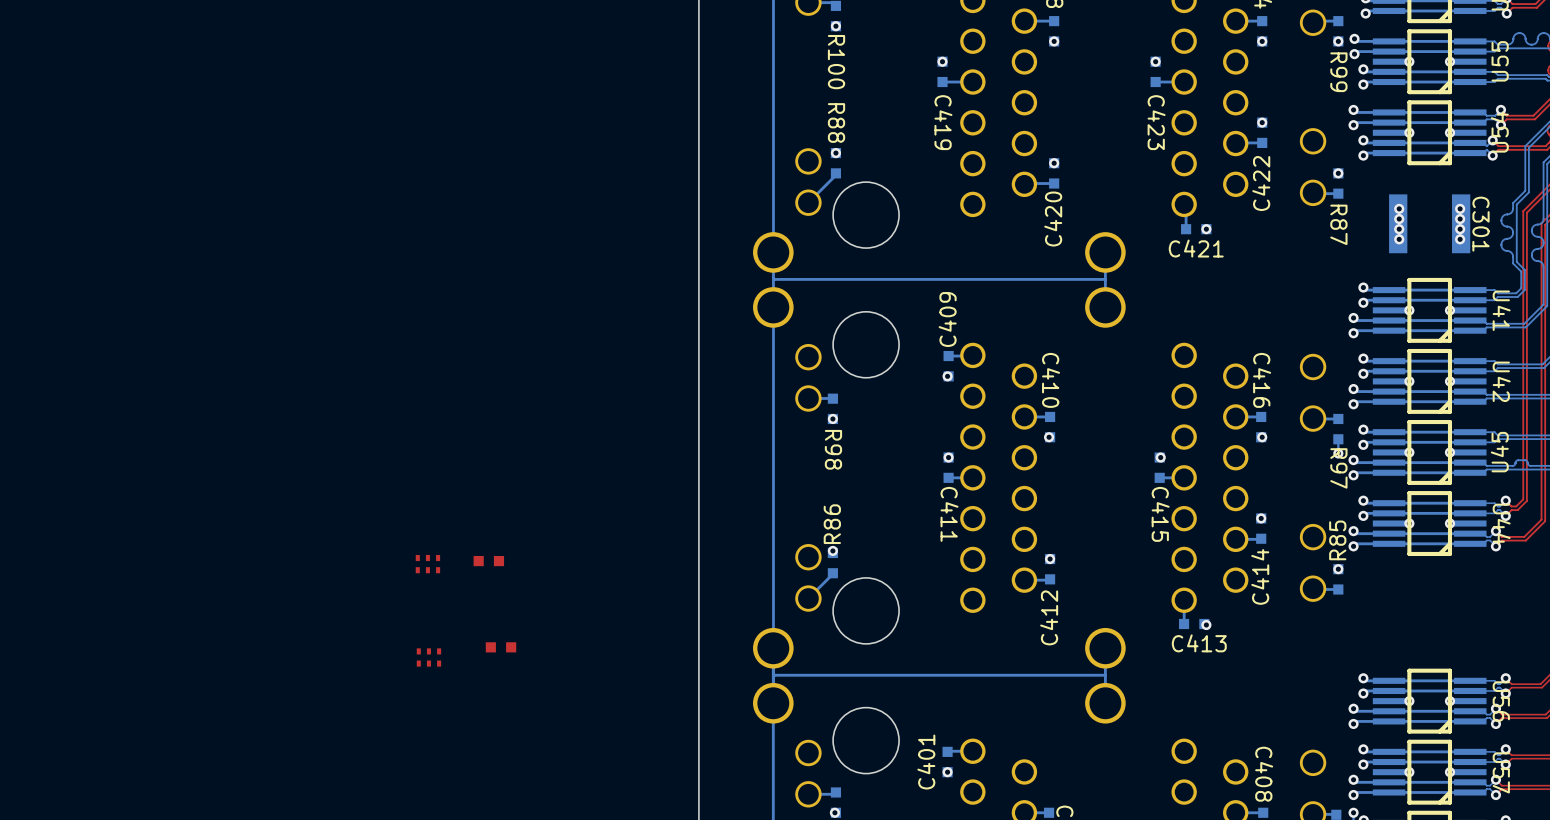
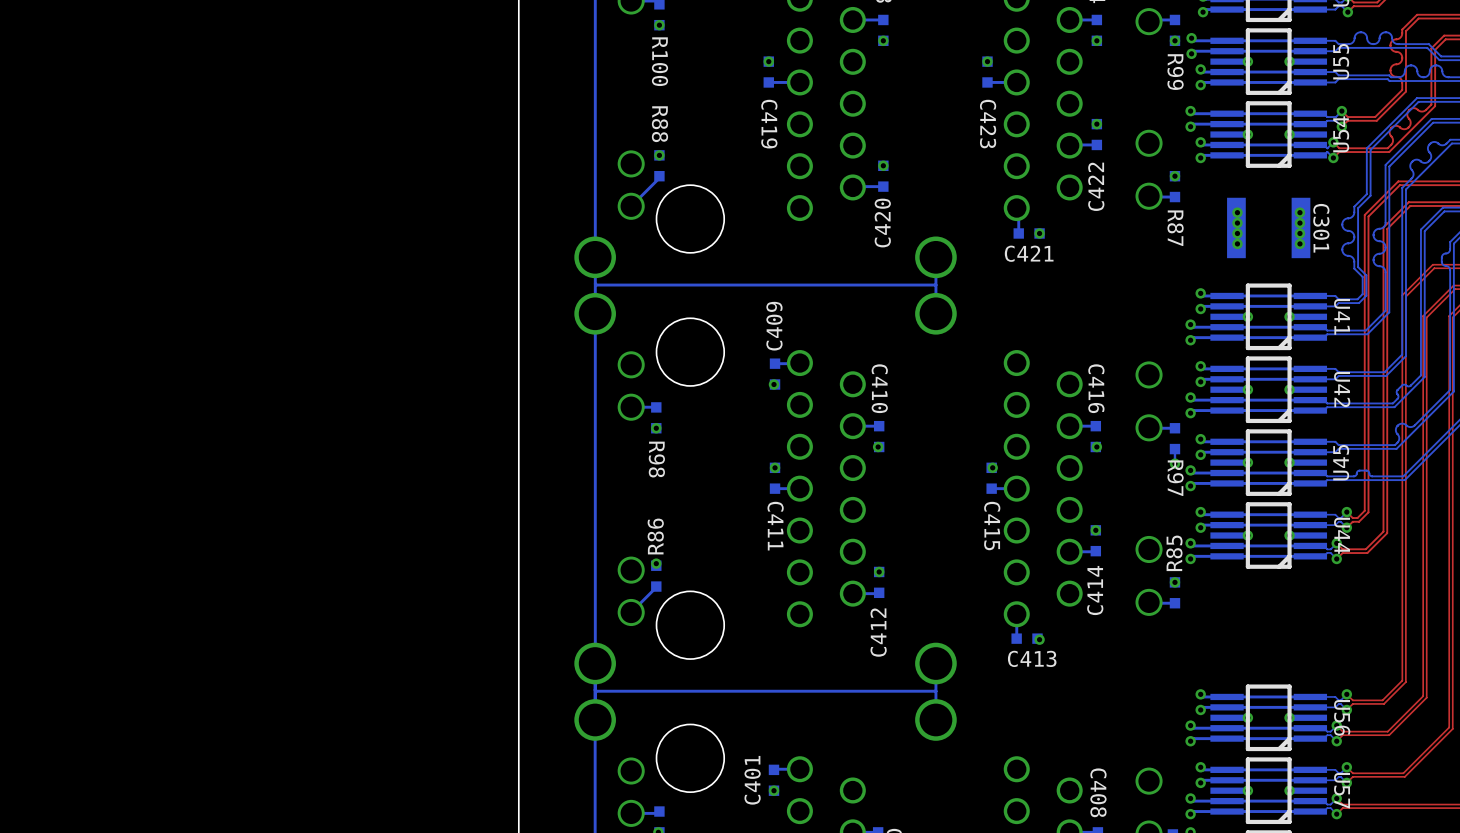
part: (488, 561) -> none
part: (427, 564) -> none
part: (501, 647) -> none
part: (428, 657) -> none

